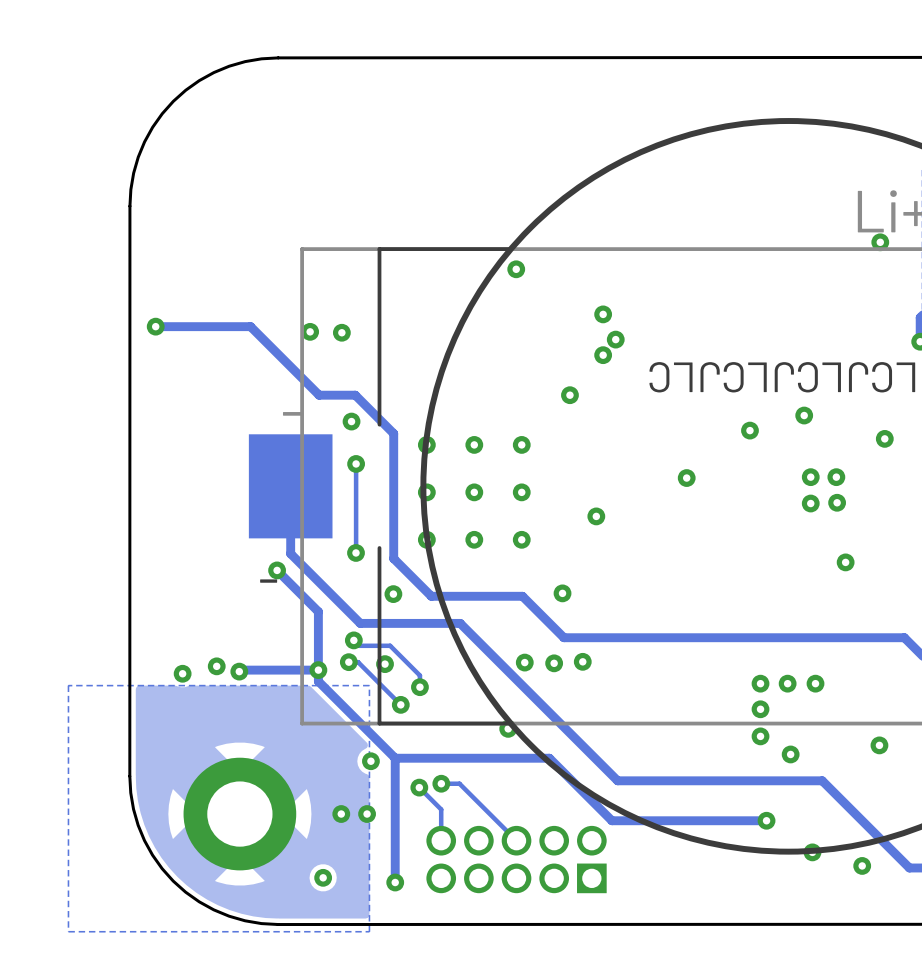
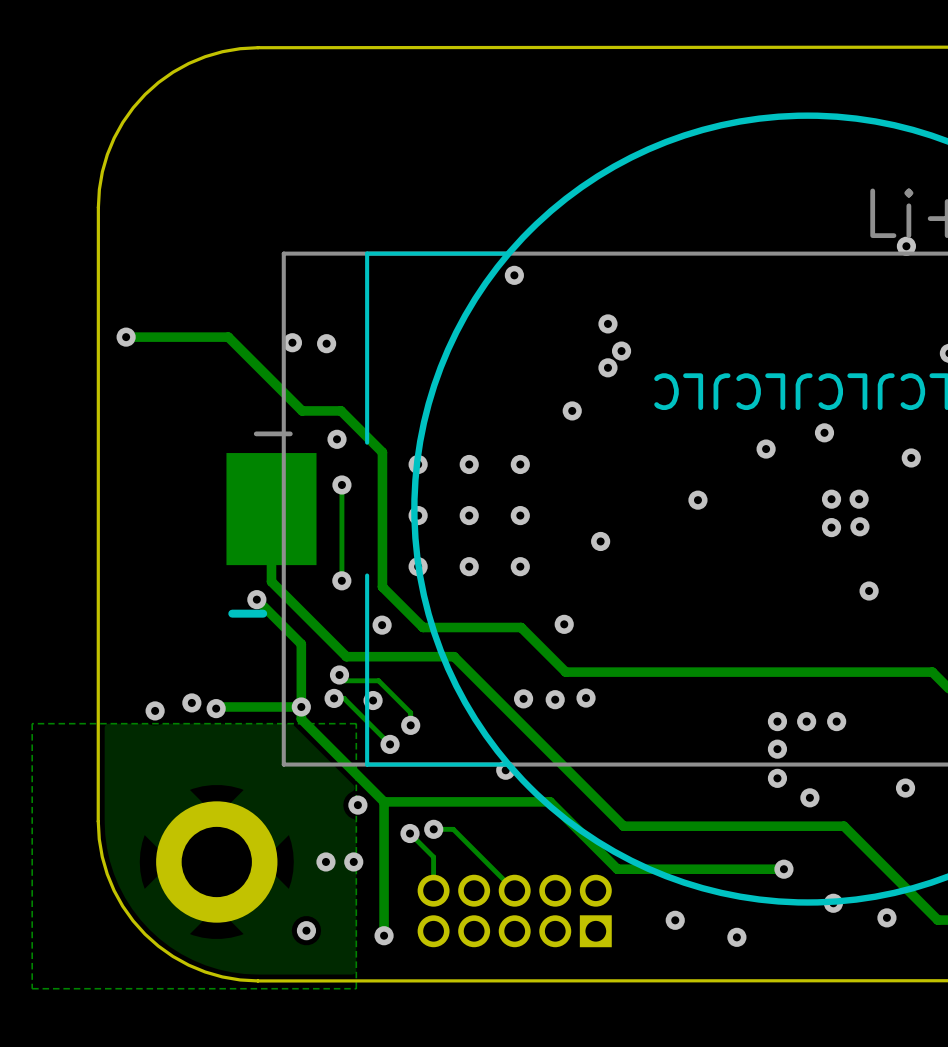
via: none -> (675, 920)
via: none -> (736, 937)

